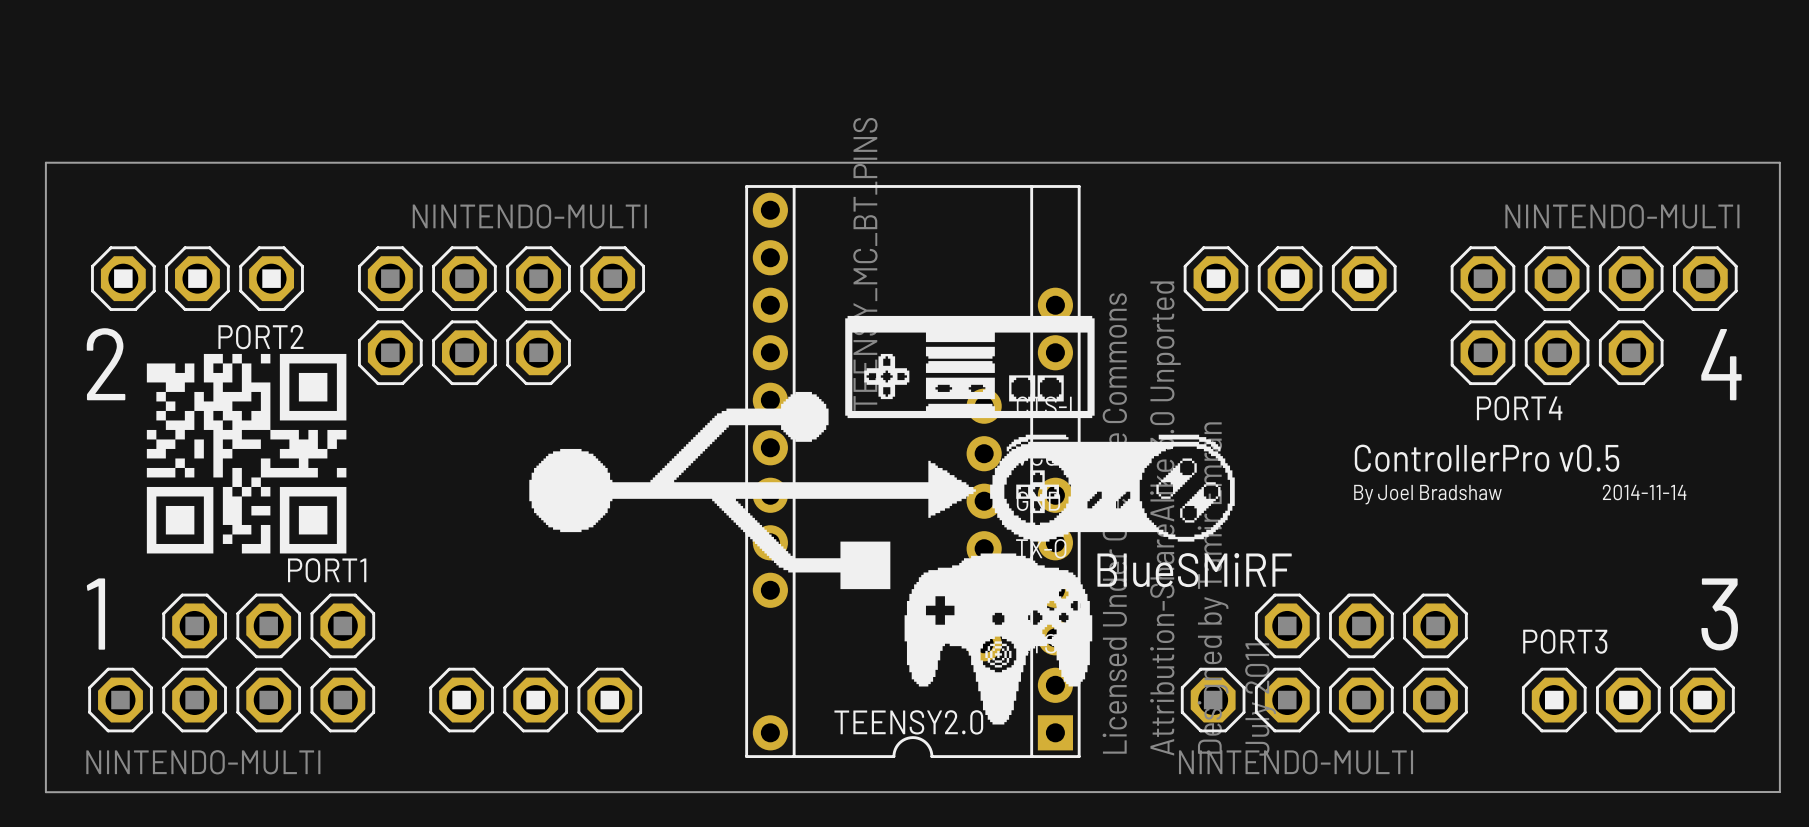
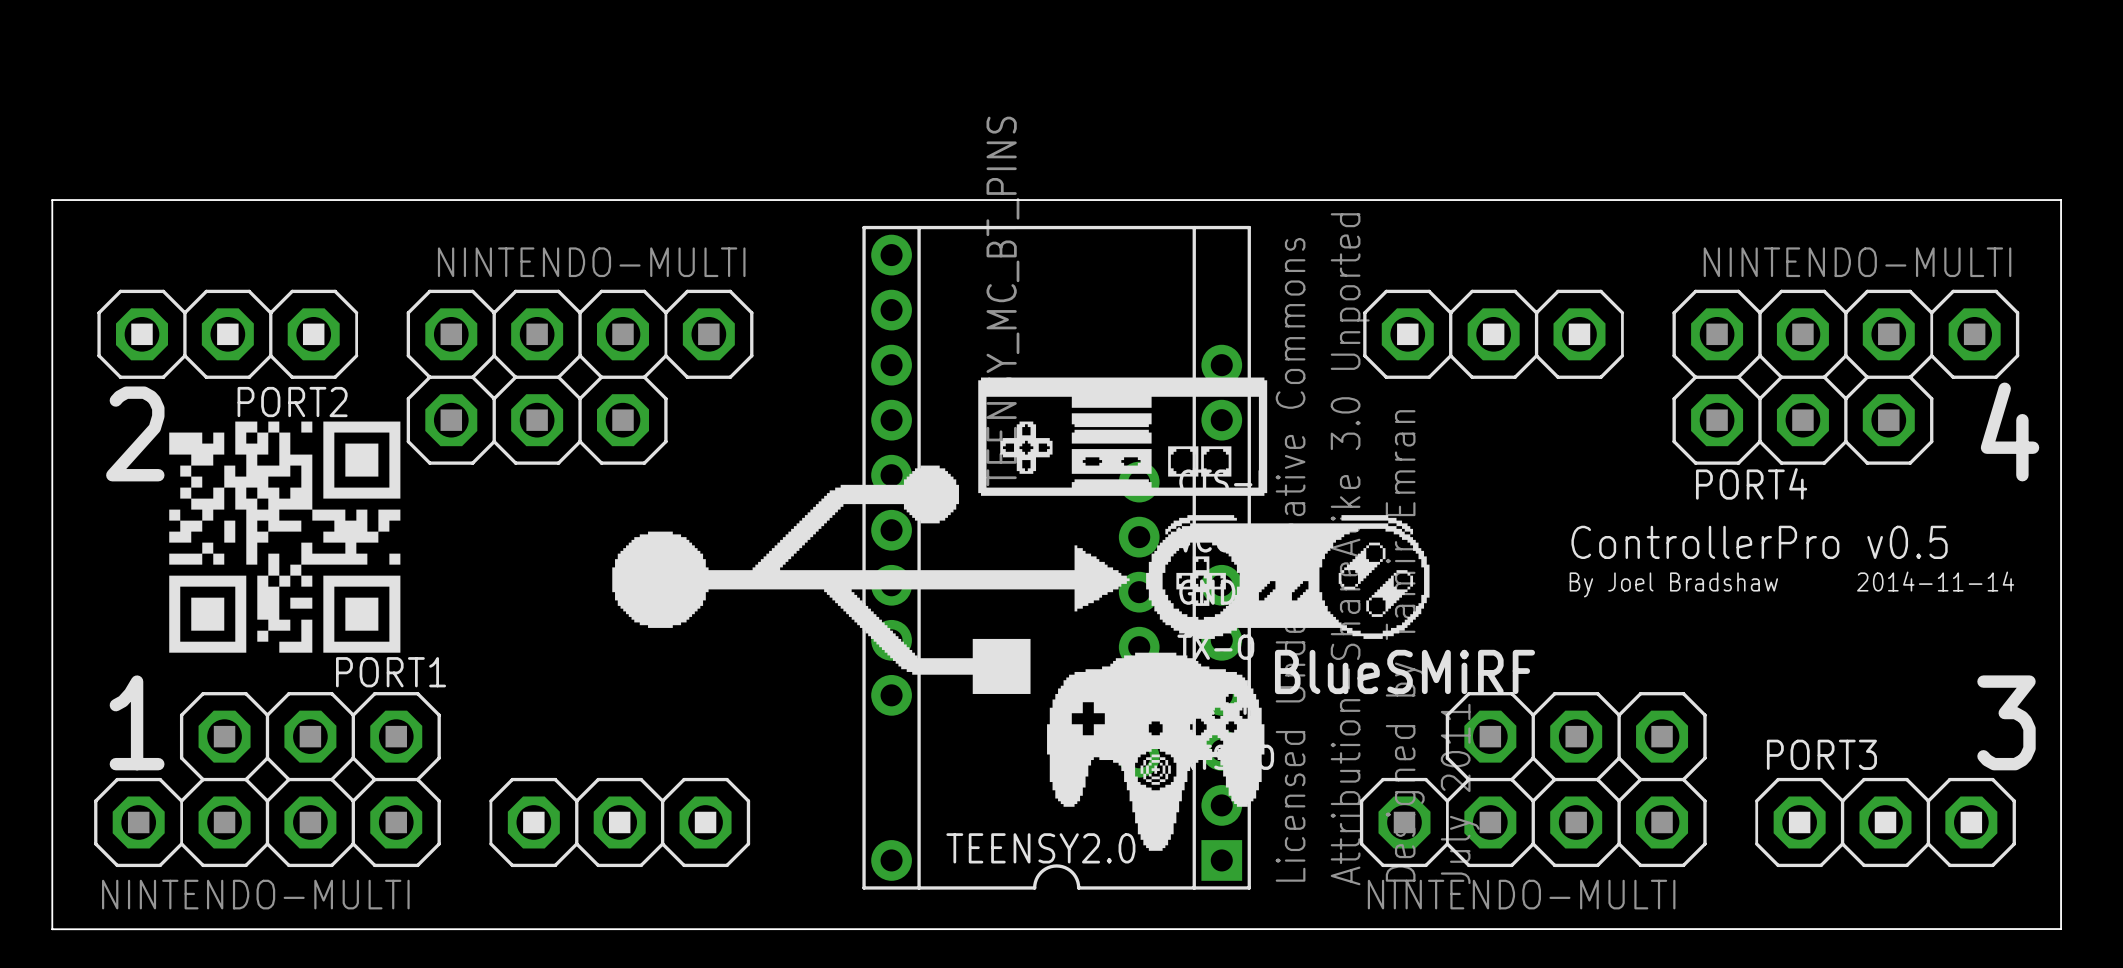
PORT2 footprint: [91, 246, 645, 386] -> [97, 289, 754, 465]
PORT4 footprint: [1183, 246, 1738, 386] -> [1363, 289, 2020, 465]
PORT1 footprint: [88, 593, 643, 733] -> [94, 692, 751, 868]
PORT3 footprint: [1180, 593, 1735, 733] -> [1359, 692, 2016, 868]

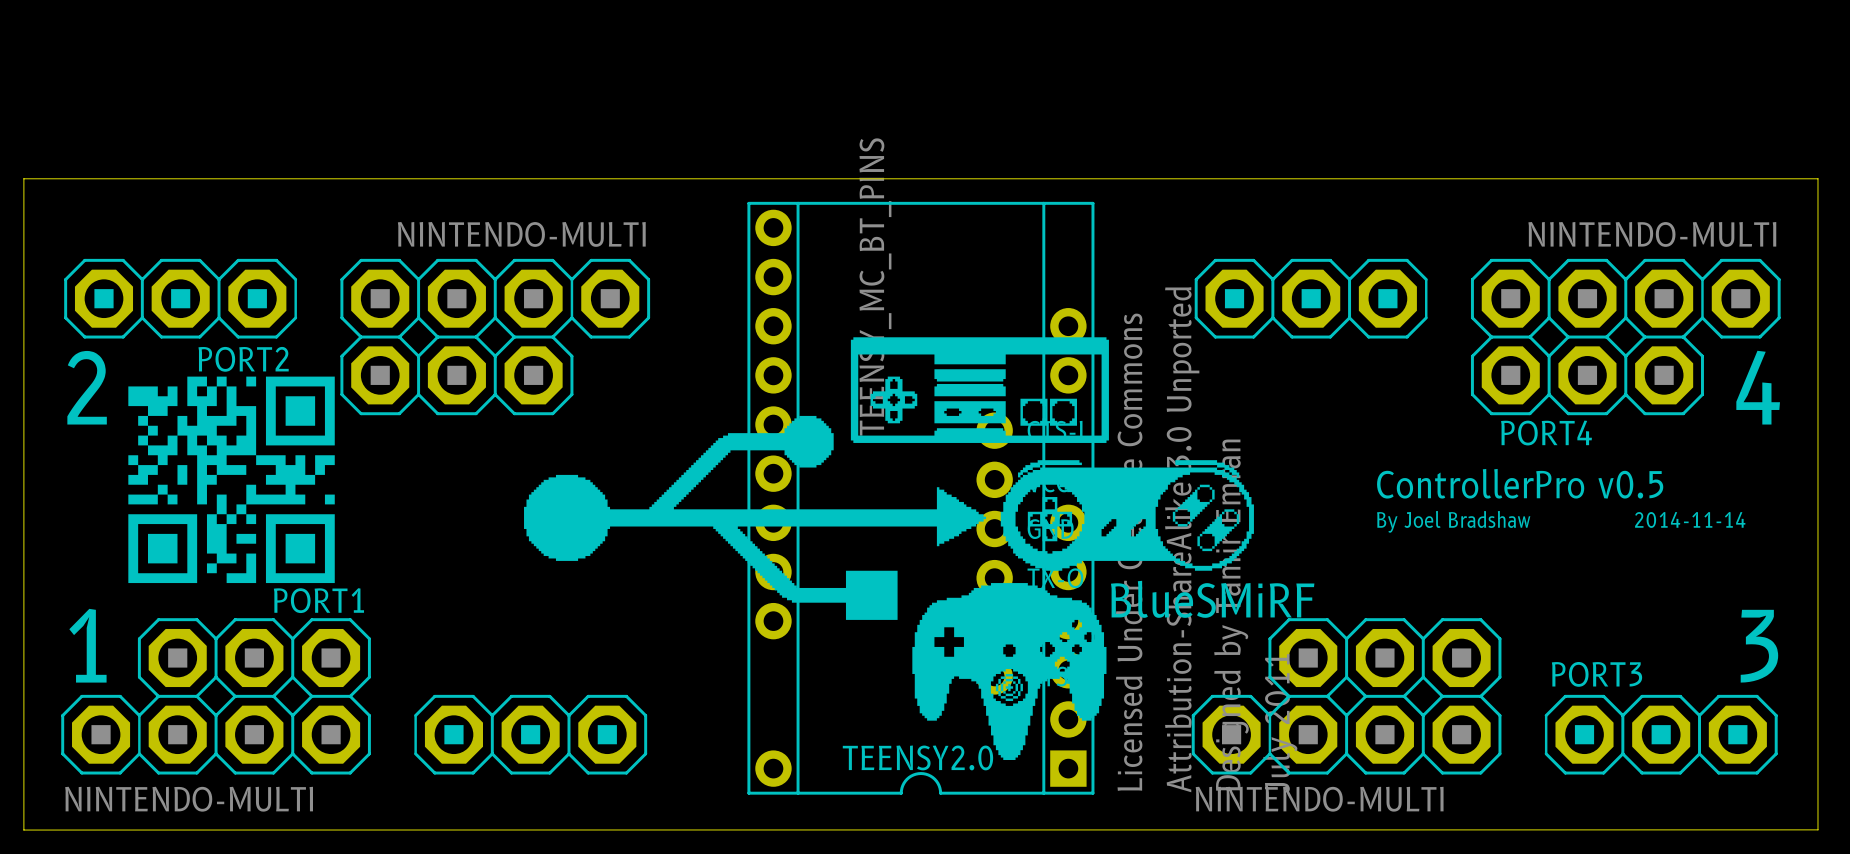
PORT2 footprint: [97, 289, 754, 465] -> [64, 258, 651, 416]
PORT4 footprint: [1363, 289, 2020, 465] -> [1194, 258, 1781, 416]
PORT1 footprint: [94, 692, 751, 868] -> [61, 618, 648, 775]
PORT3 footprint: [1359, 692, 2016, 868] -> [1191, 618, 1778, 775]

